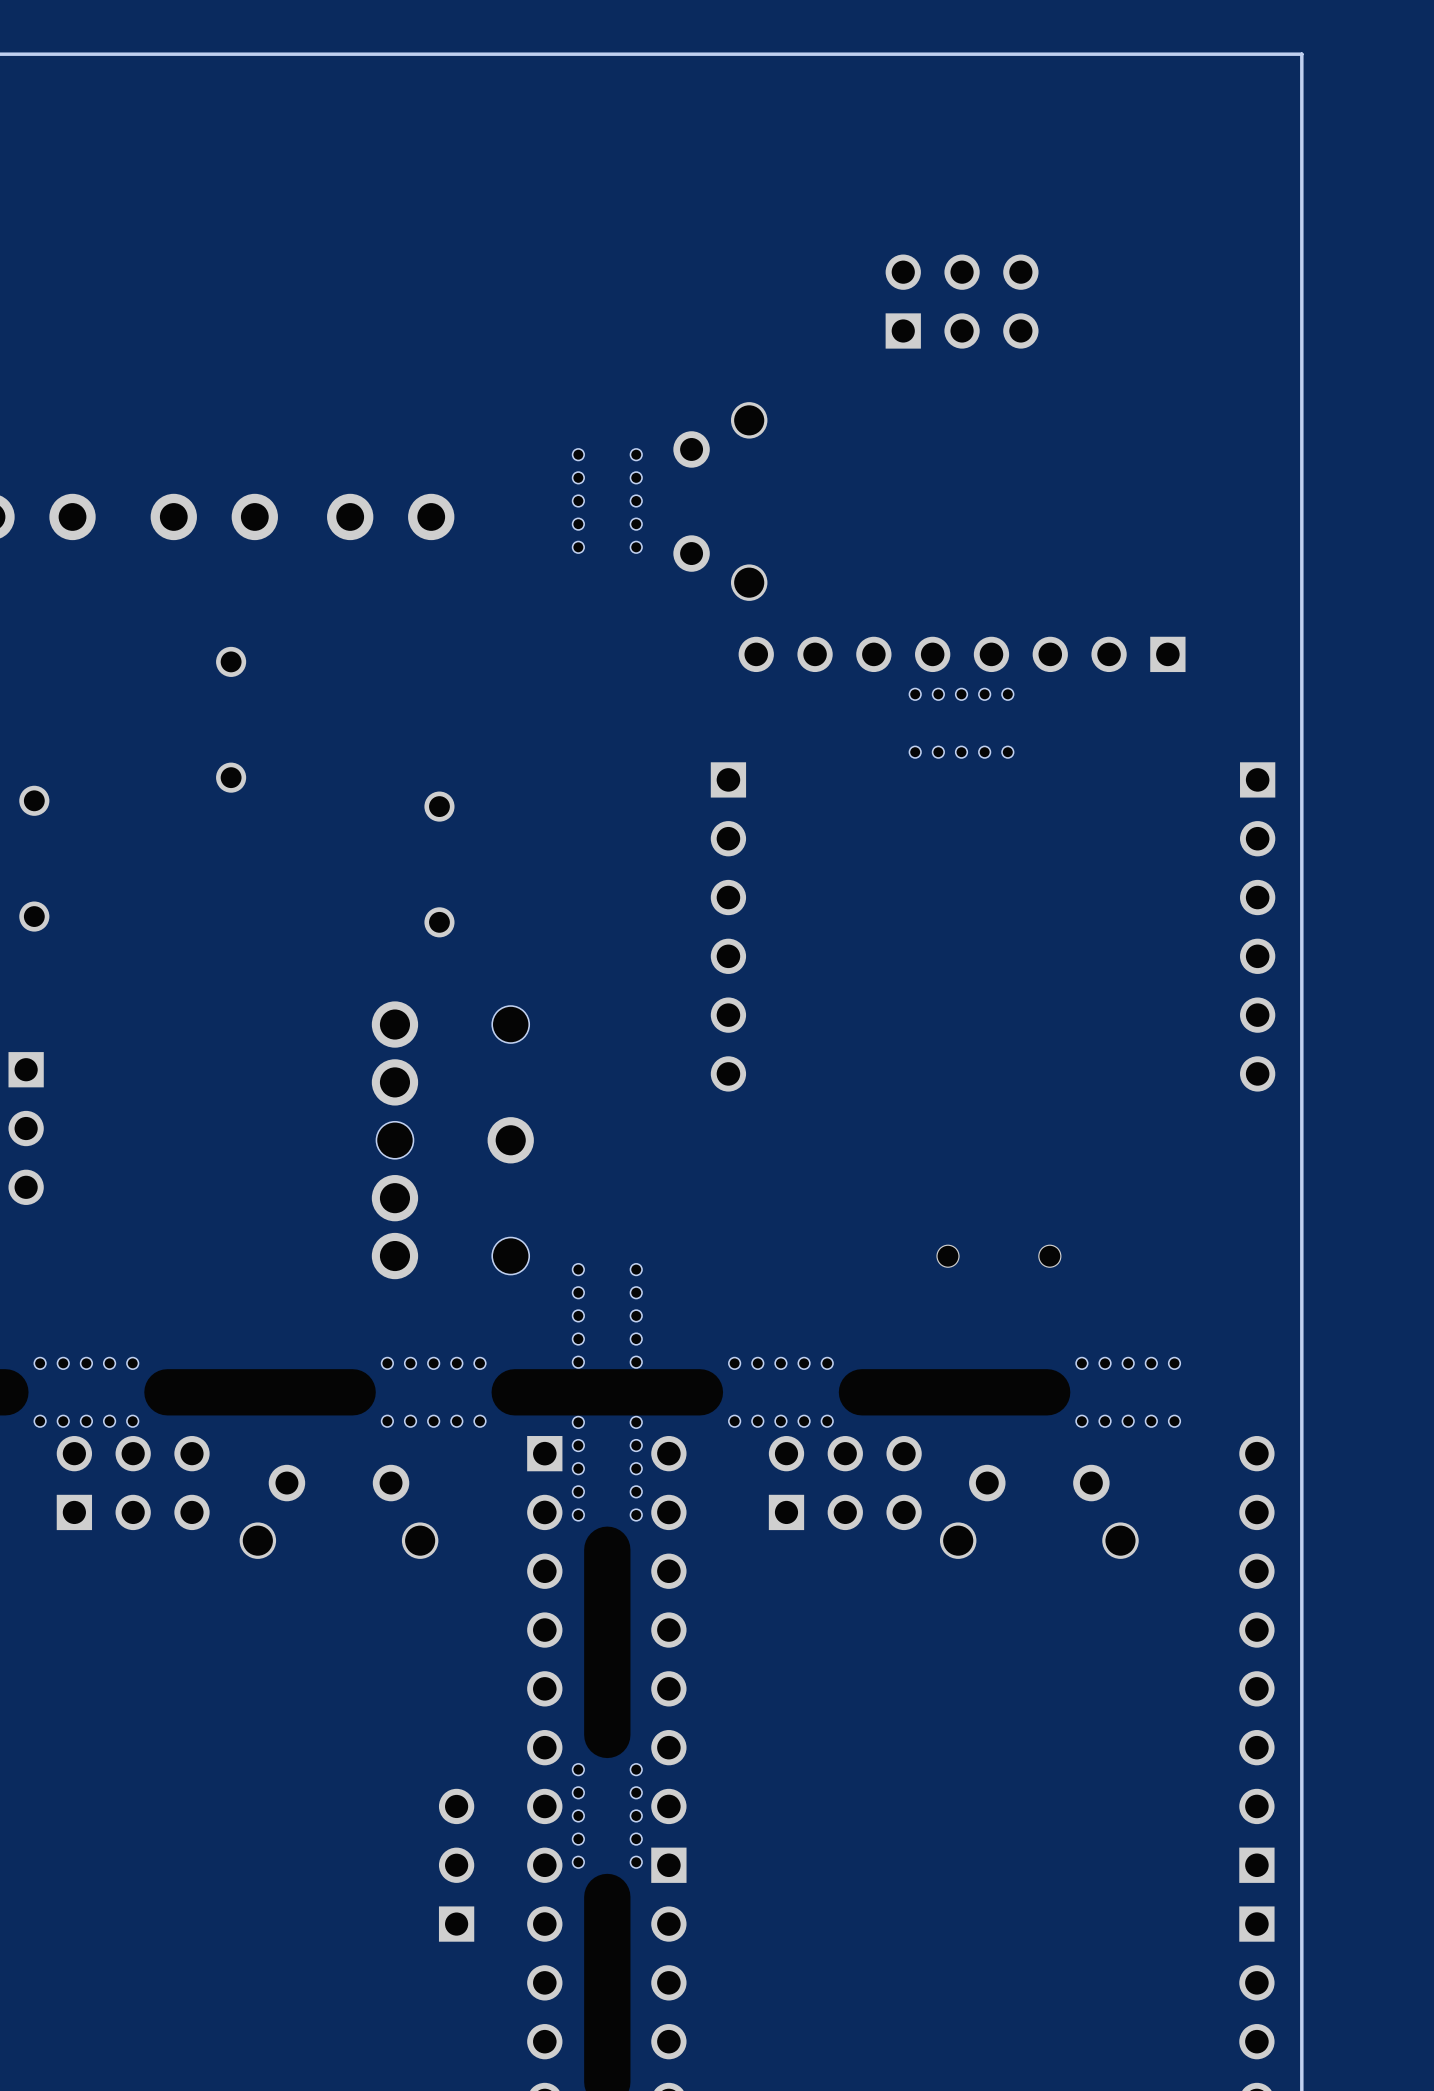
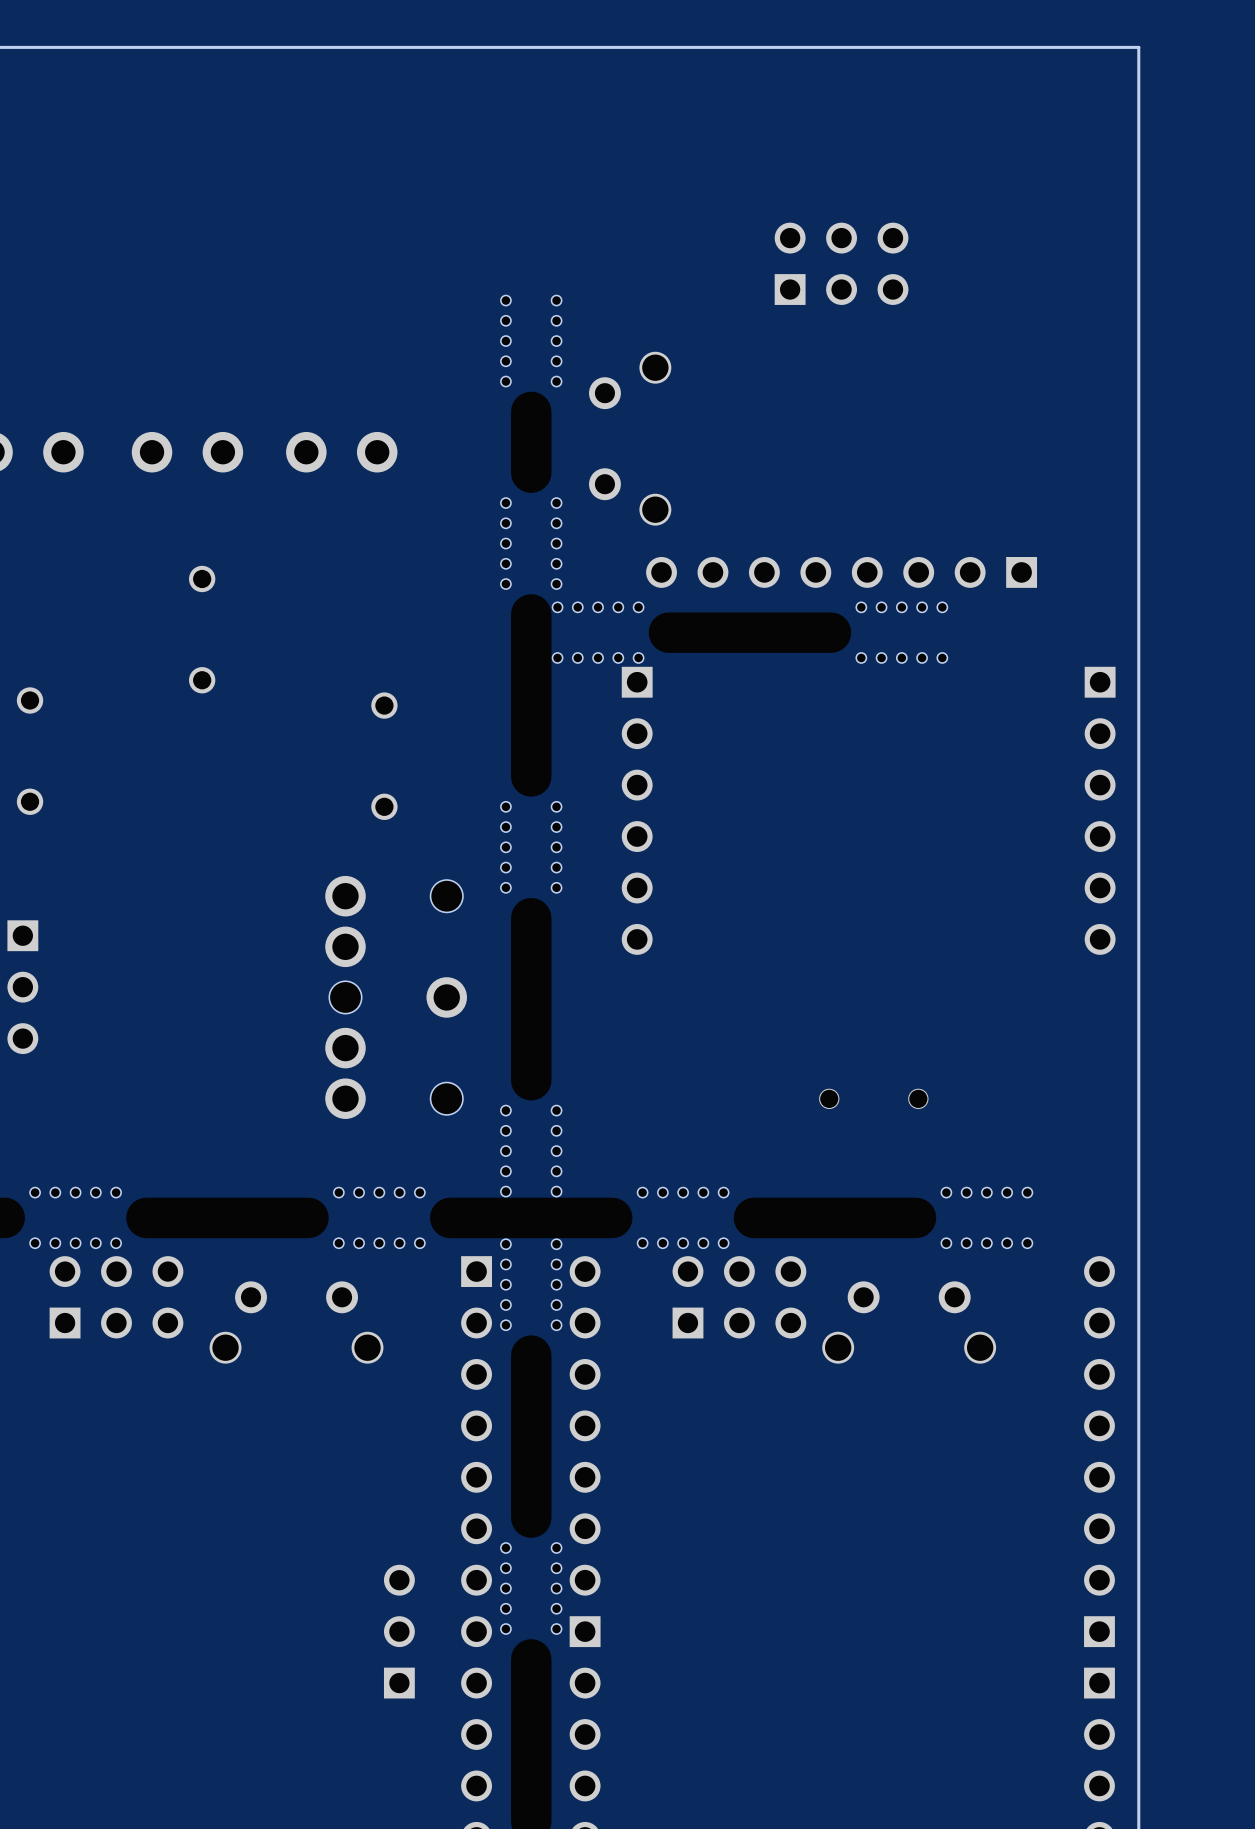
part: none -> (531, 341)
part footprint: [572, 448, 643, 554] -> [510, 391, 552, 493]
part: none -> (531, 543)
part: none -> (598, 632)
part: none -> (749, 632)
part position: (961, 723) -> (901, 632)
part: none -> (531, 695)
part: none -> (531, 847)
part: none -> (531, 999)

